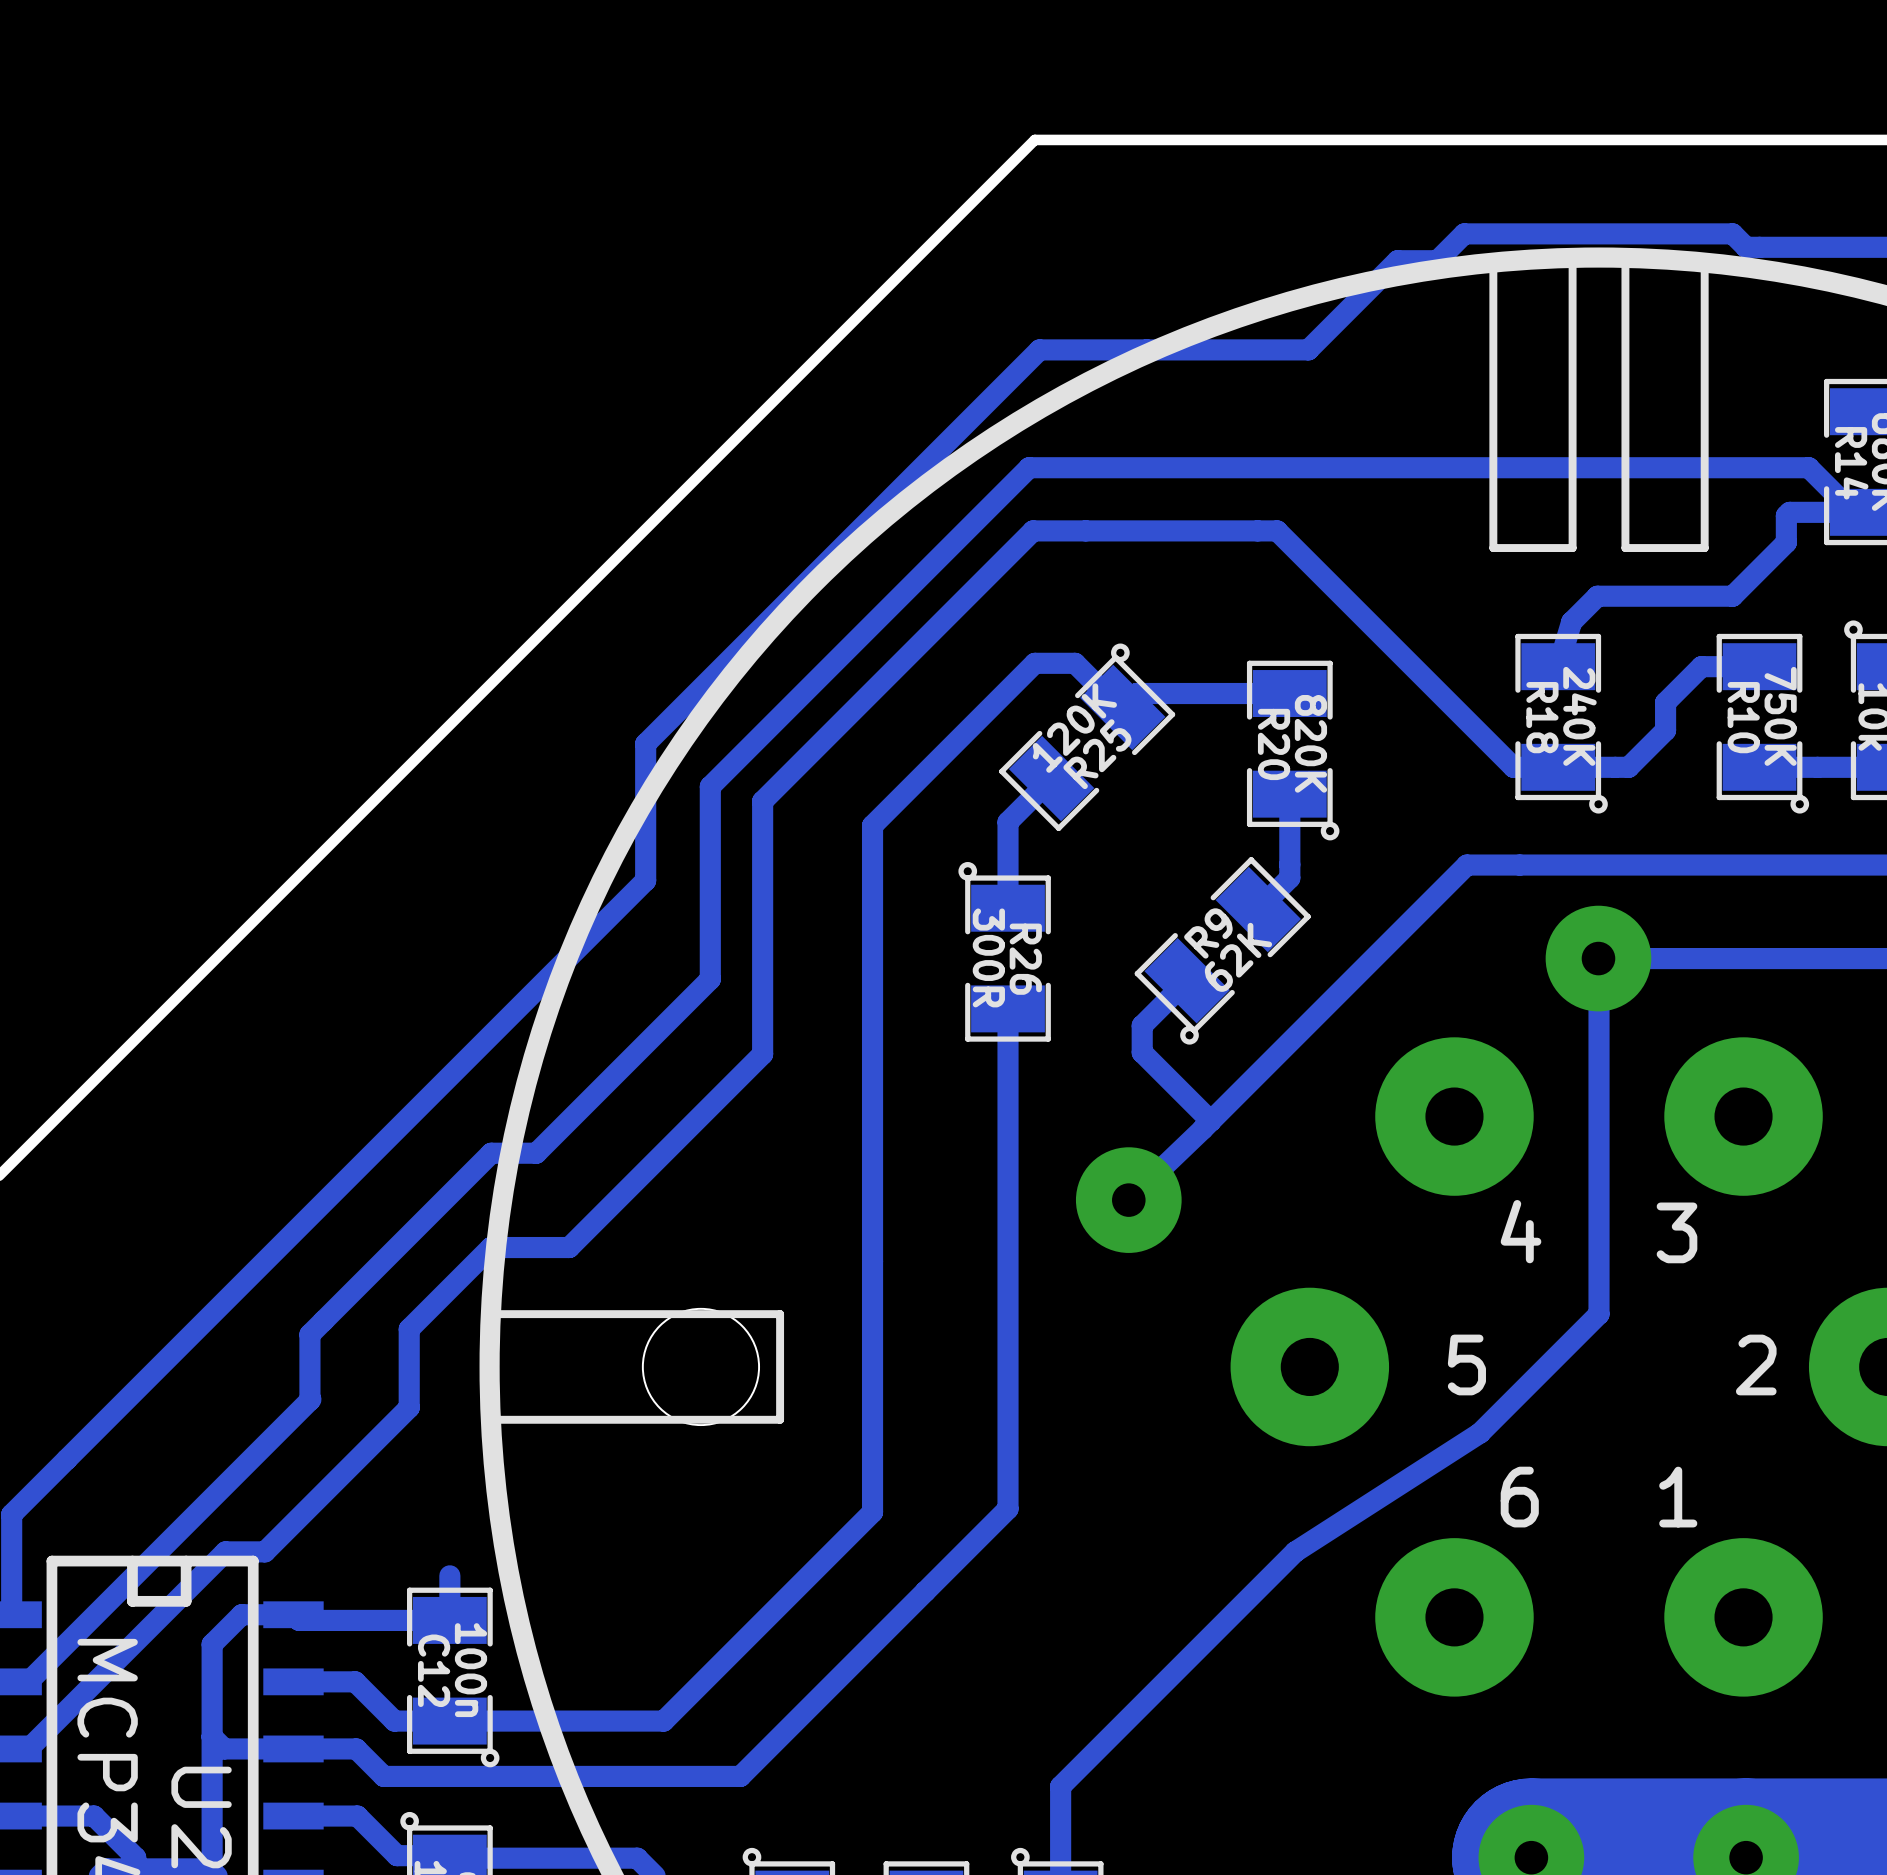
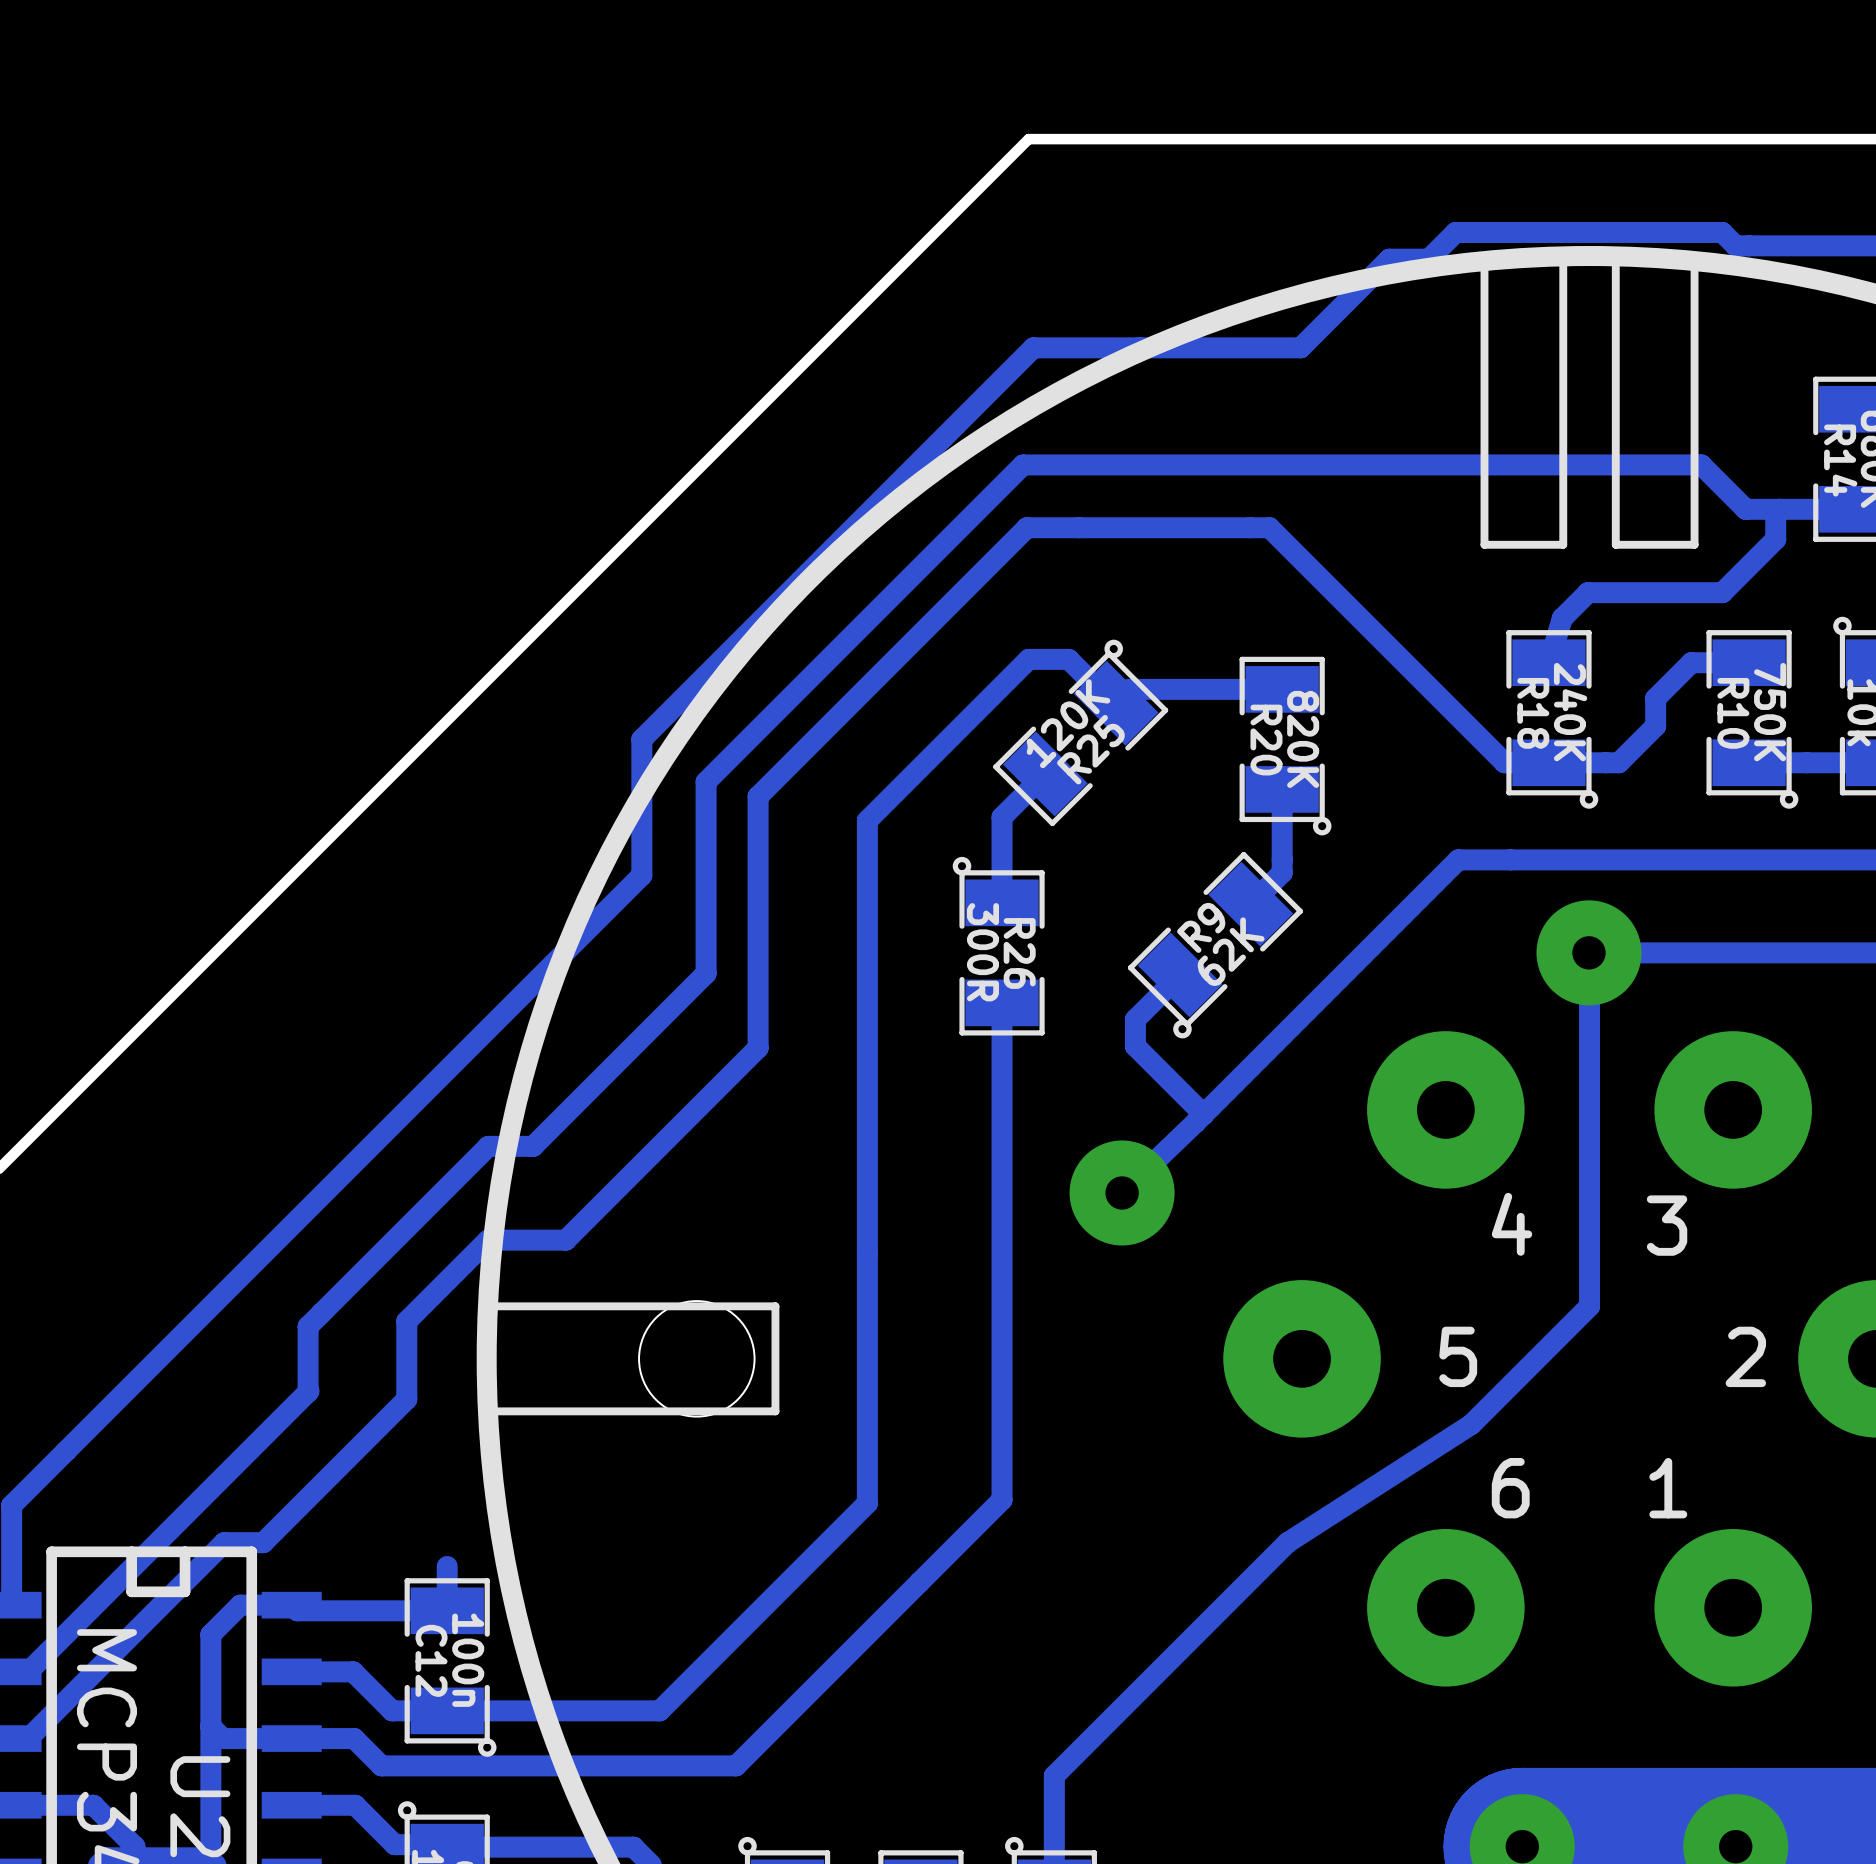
track: (1711, 467) (1808, 467) (1853, 512) -> (1701, 464) (1745, 509) (1779, 509)

